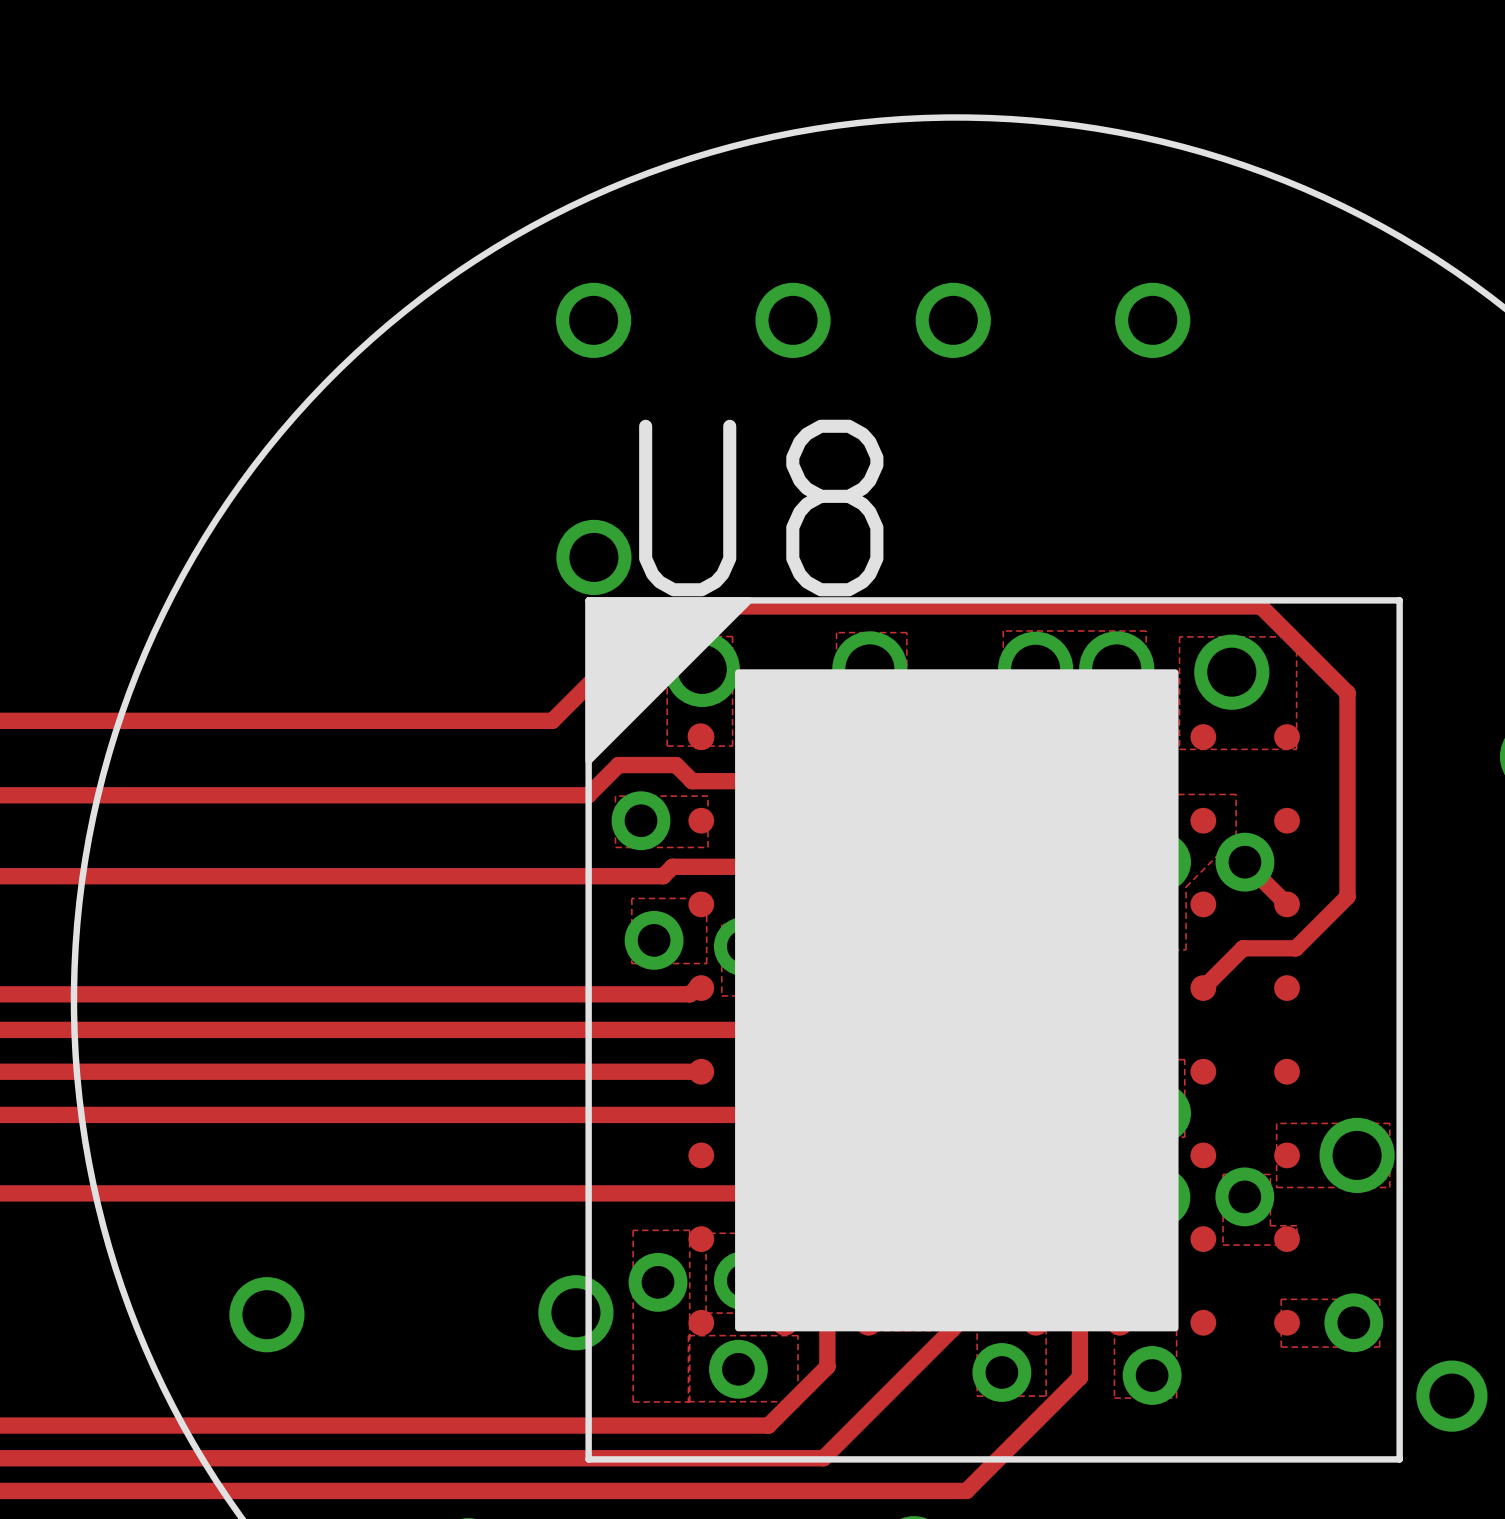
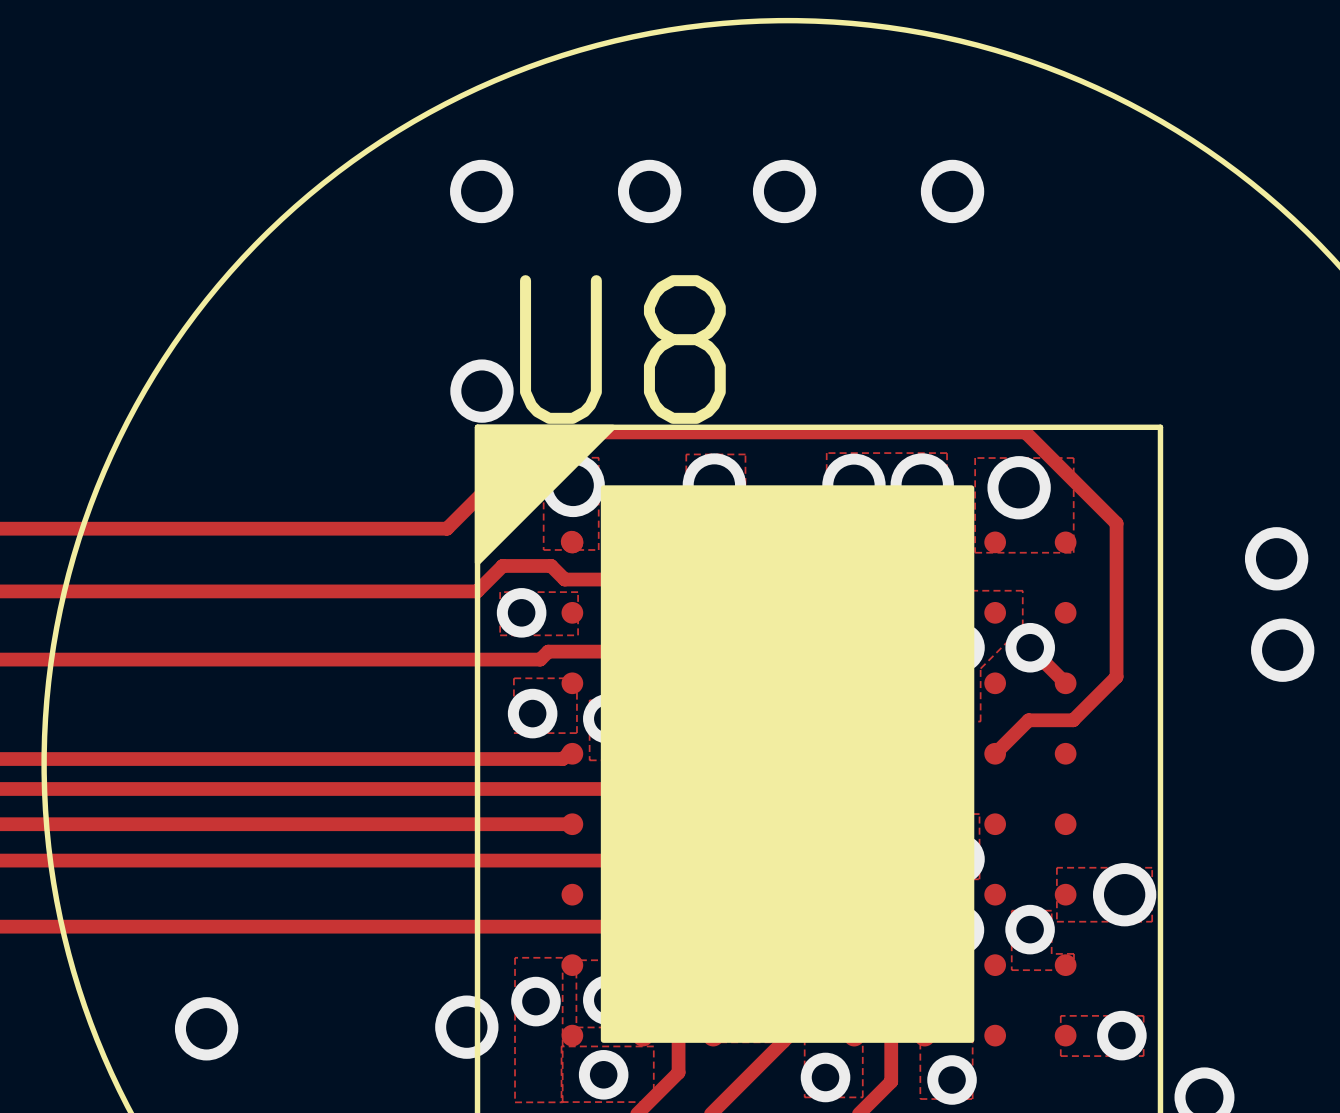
track: (1239, 606) (1260, 606) (1347, 693) (1347, 714) -> (1025, 432) (1116, 523)

